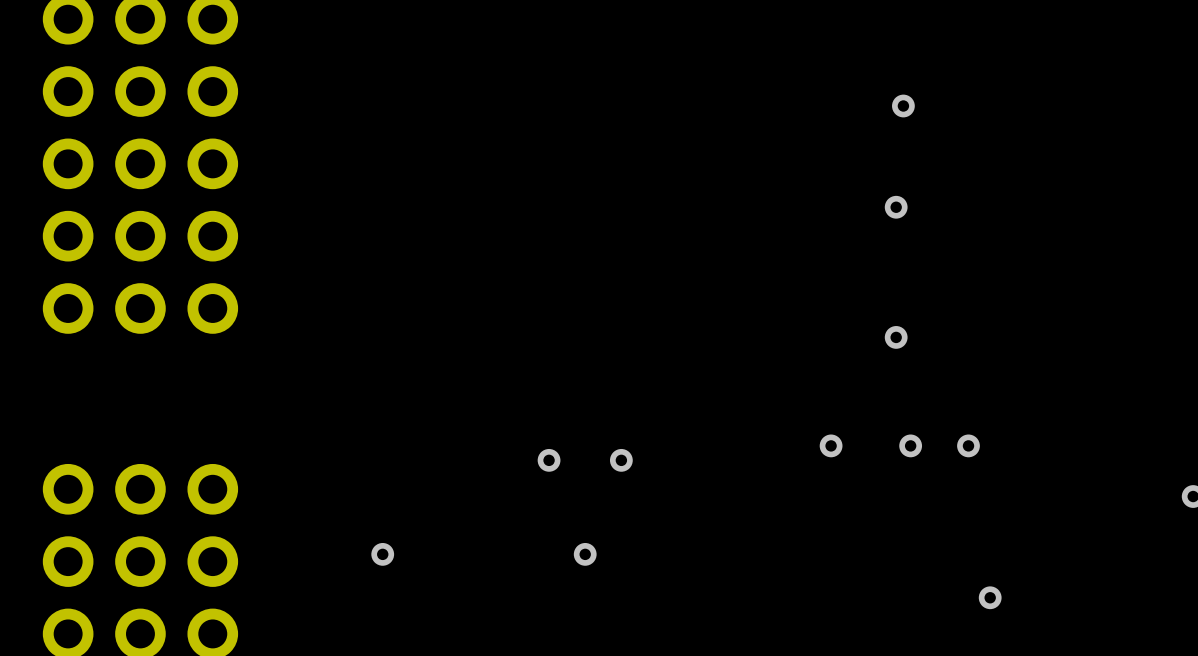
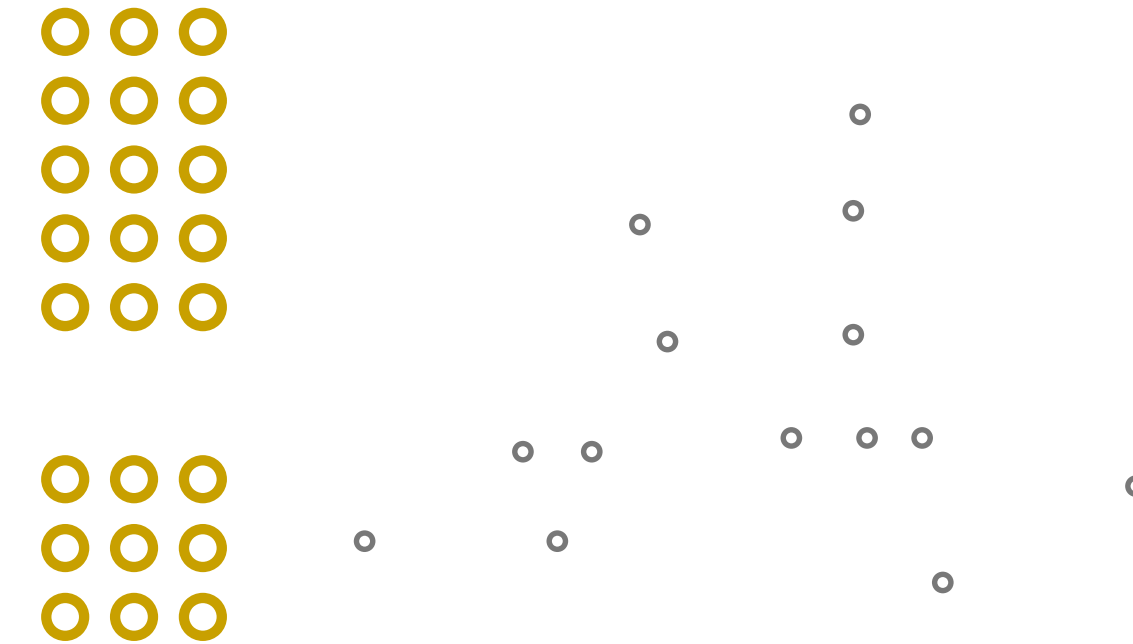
via: none -> (639, 224)
via: none -> (667, 341)

